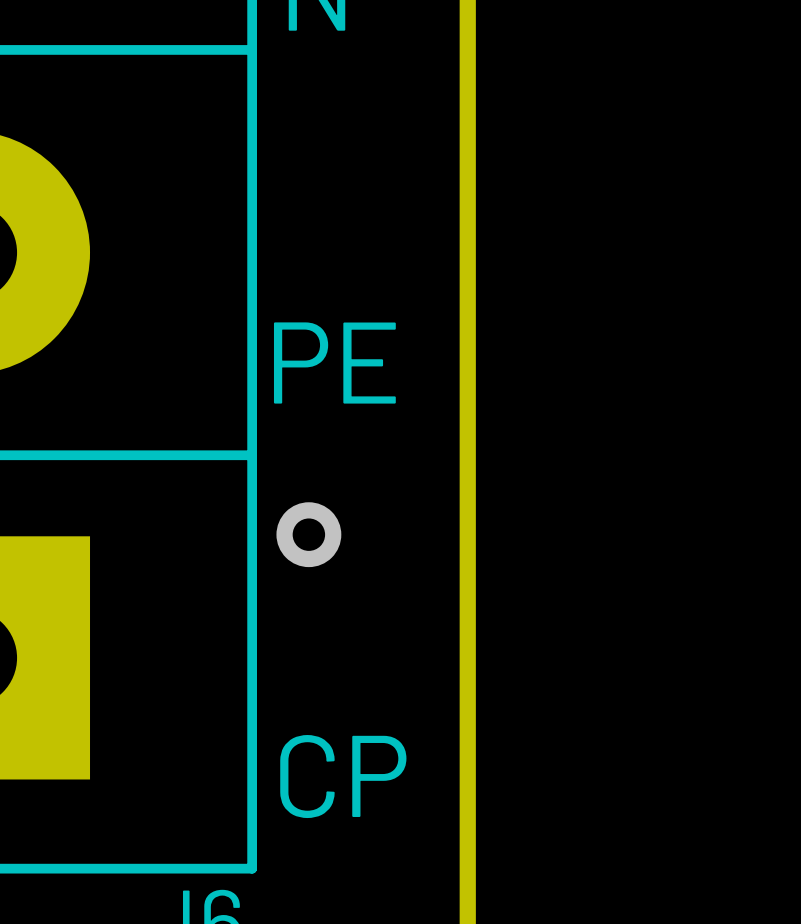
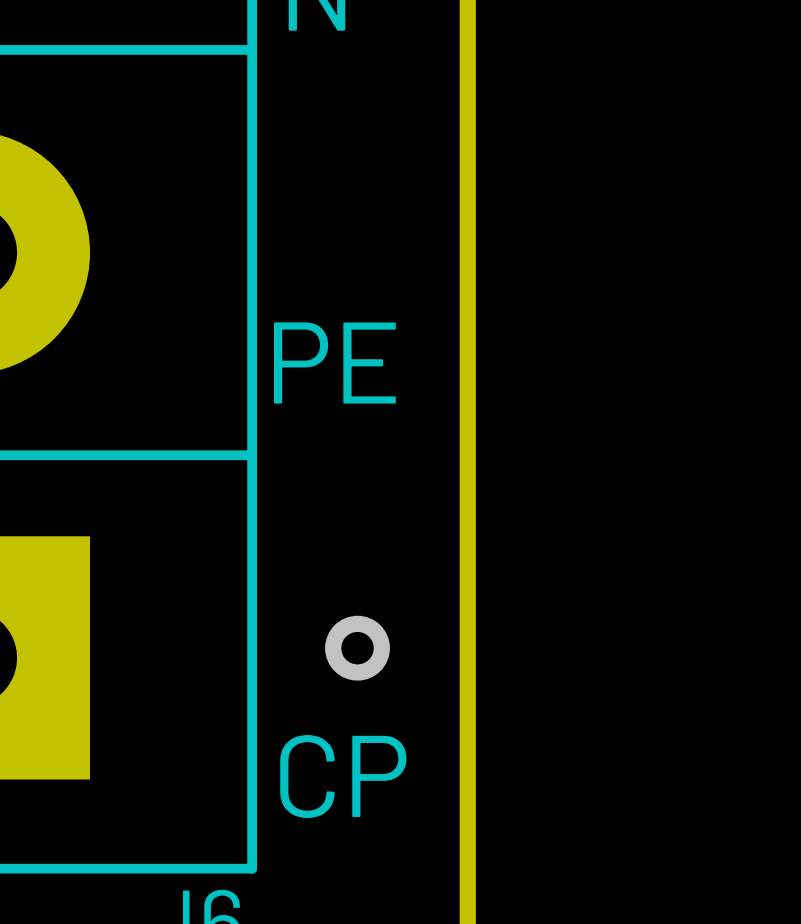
via position: (308, 534) -> (357, 648)

